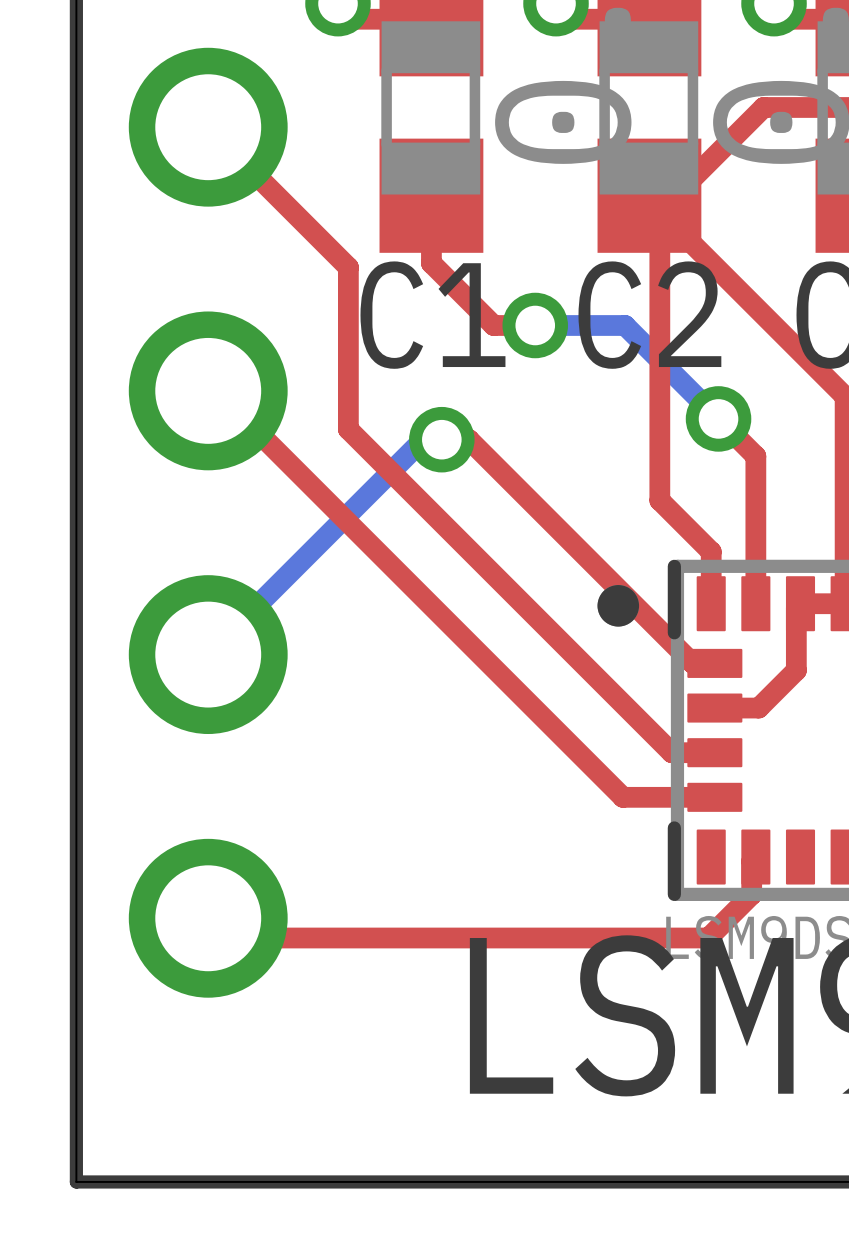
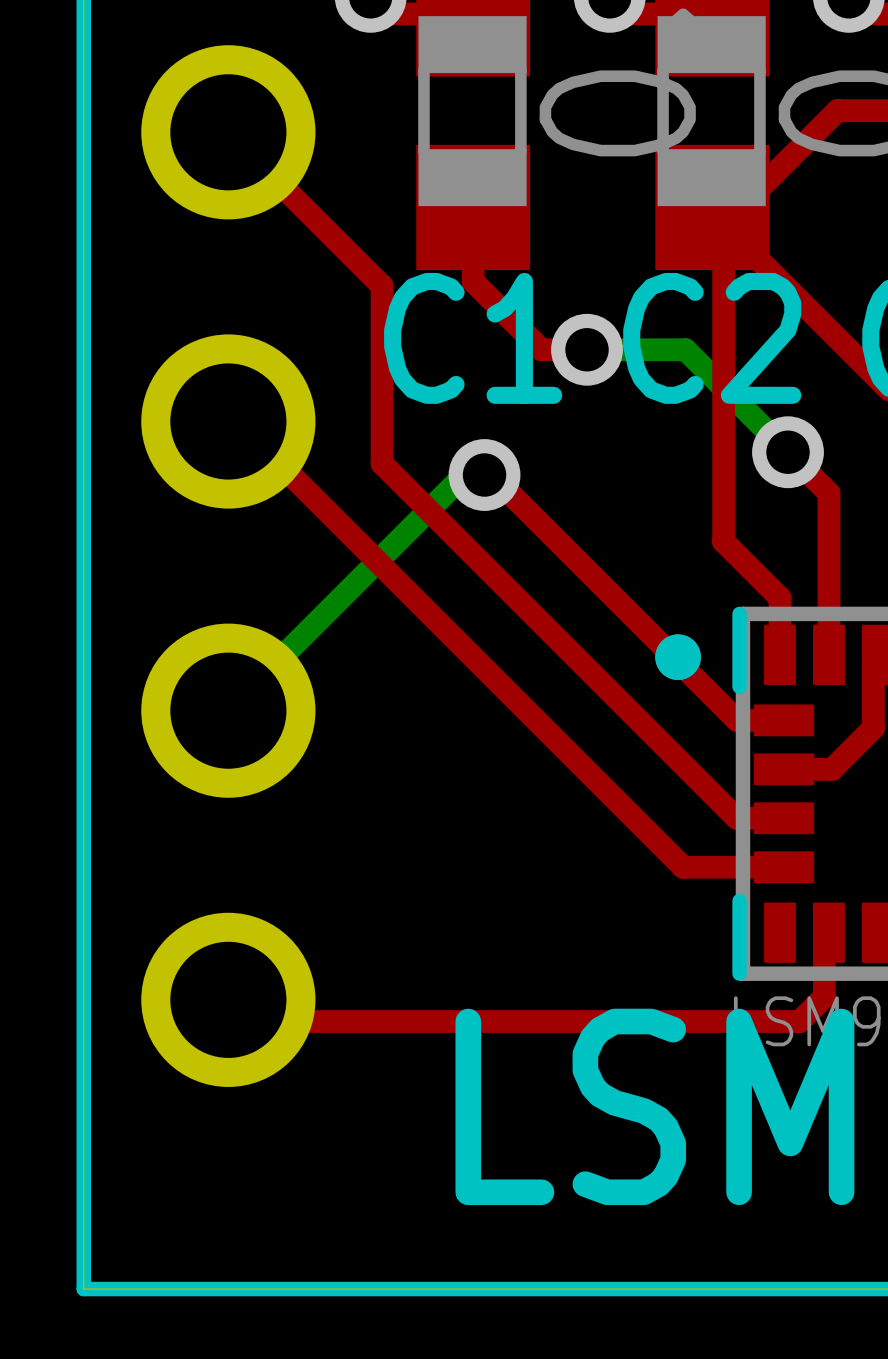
top track: (448, 439) (469, 439) (692, 663) -> (491, 475) (736, 720) (759, 720)
top track: (751, 894) (708, 938) -> (824, 974) (824, 996) (799, 1021) (776, 1021)

